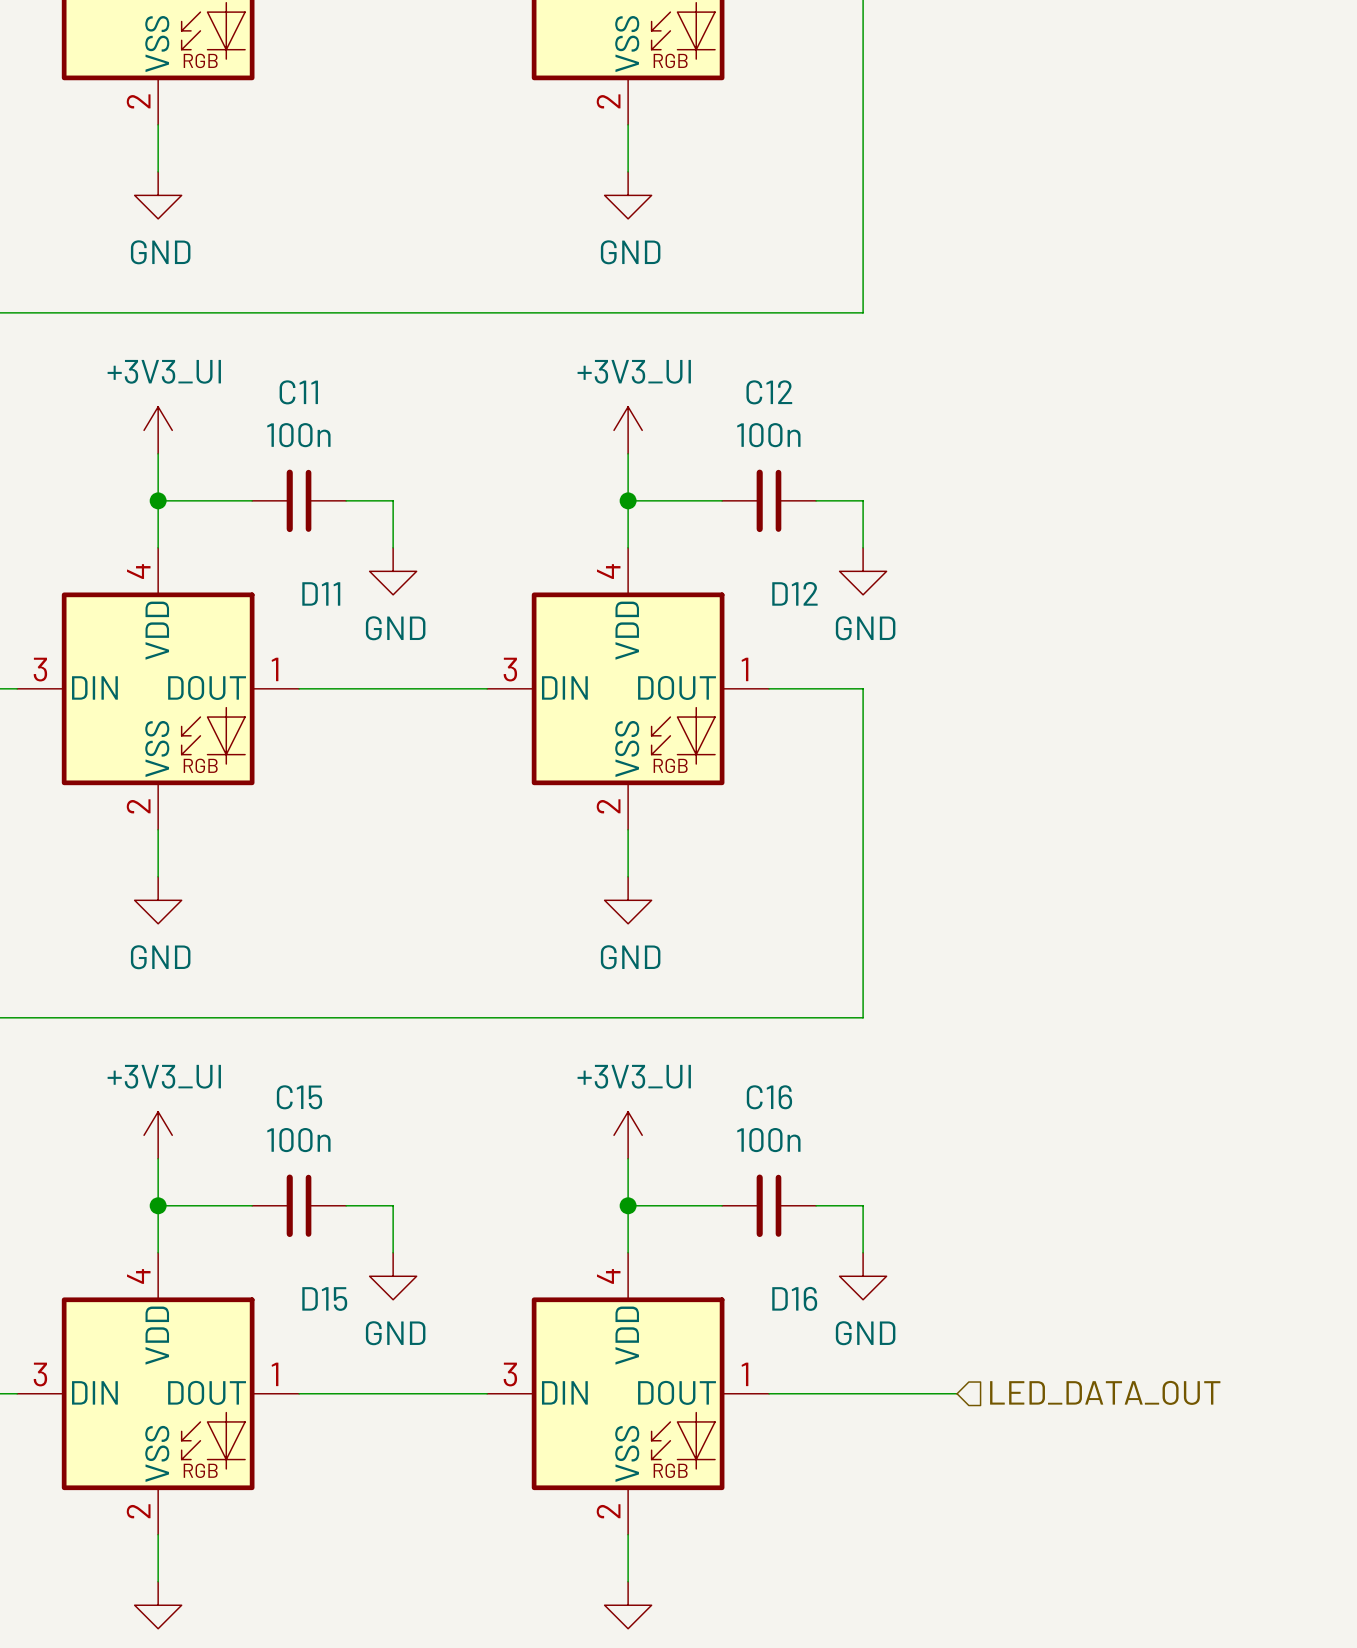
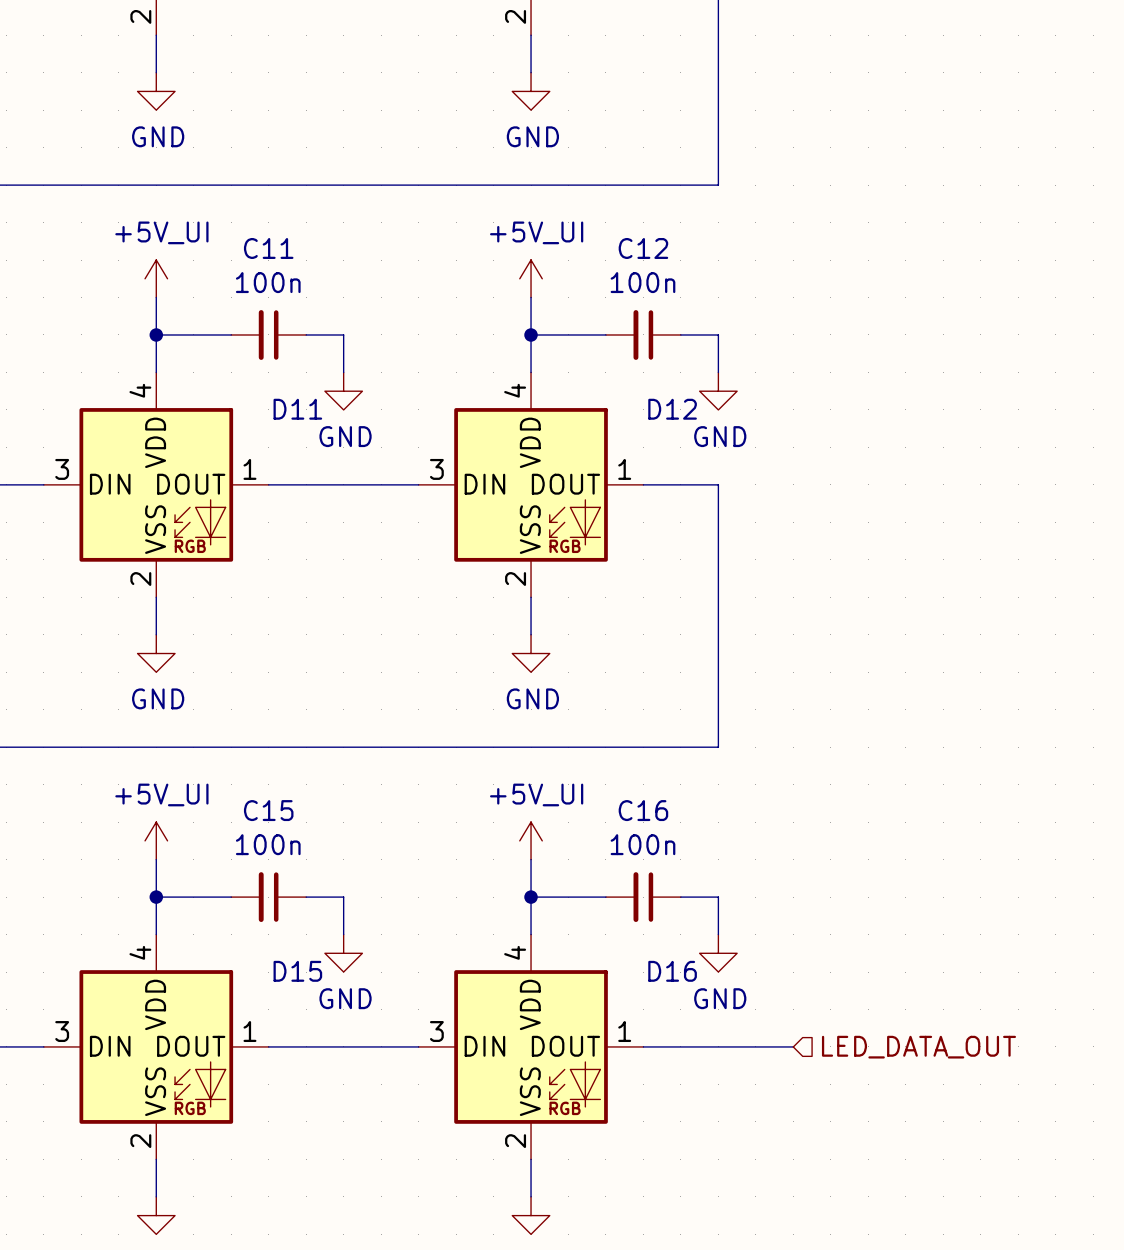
power symbol: +3V3_UI (158, 430) -> +5V_UI (156, 278)
power symbol: +3V3_UI (628, 430) -> +5V_UI (531, 278)
power symbol: +3V3_UI (158, 1135) -> +5V_UI (156, 840)
power symbol: +3V3_UI (628, 1135) -> +5V_UI (531, 840)

